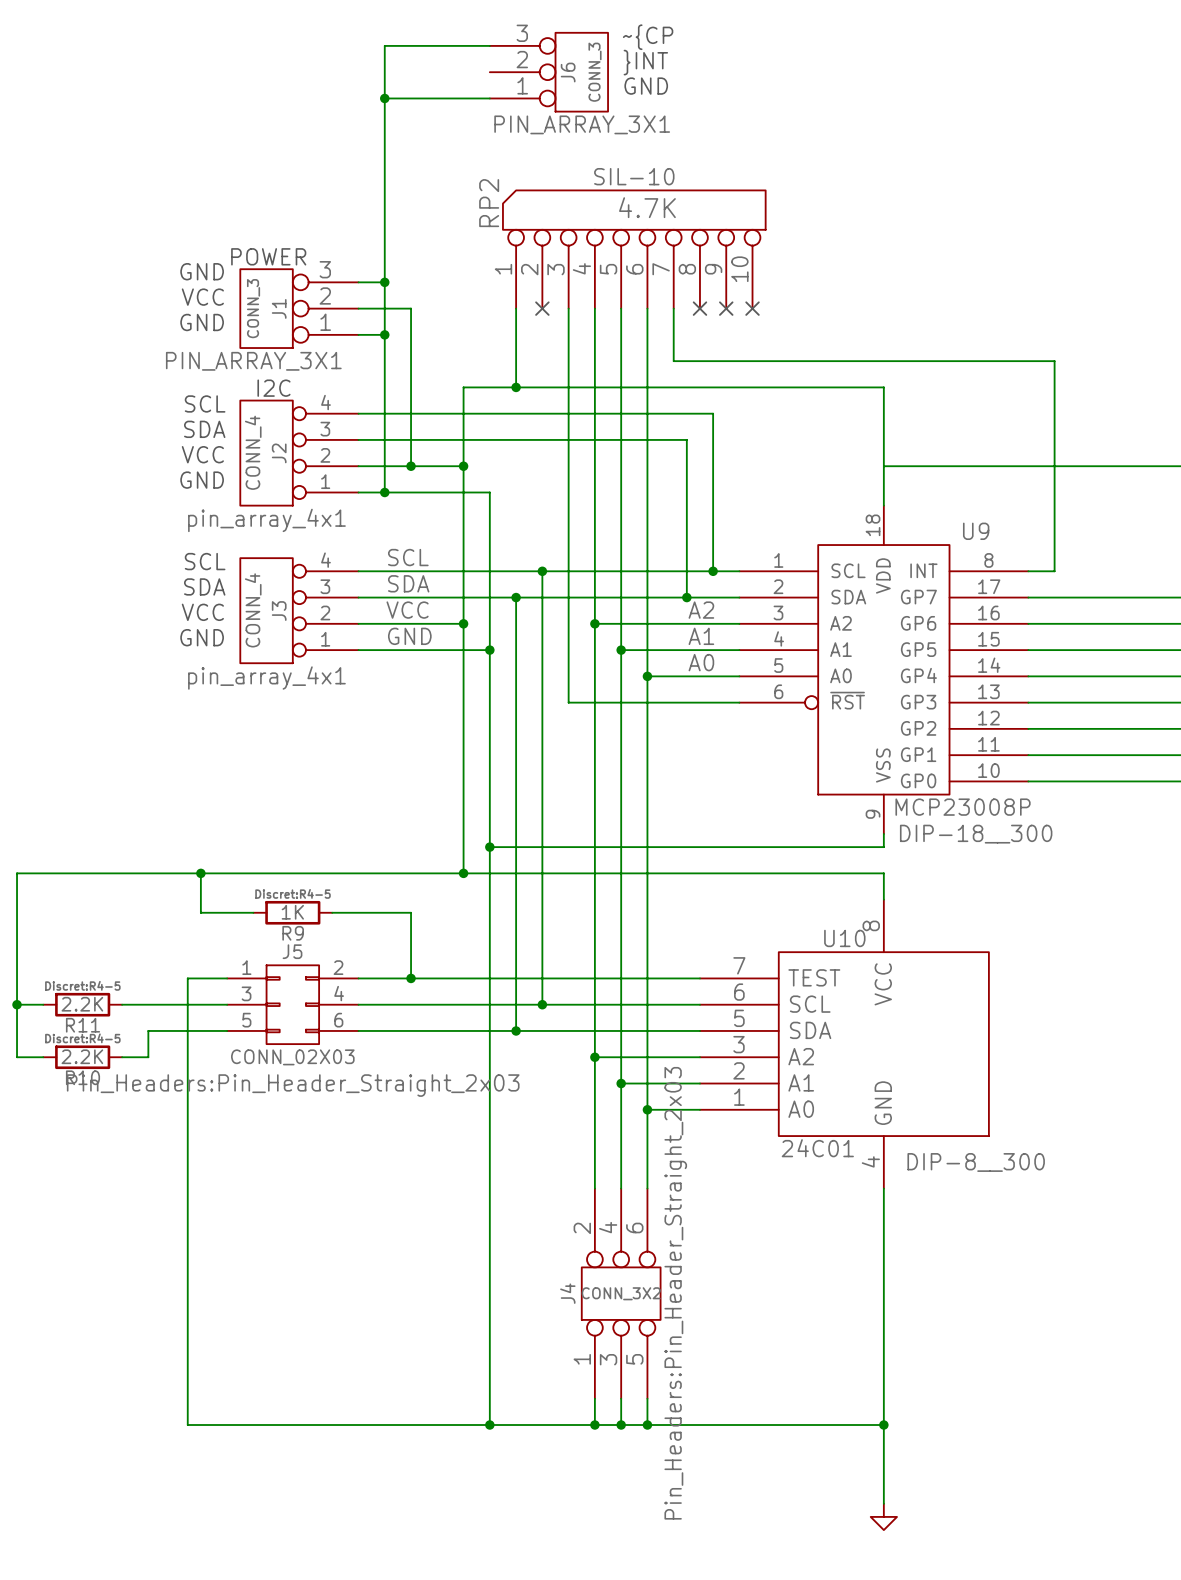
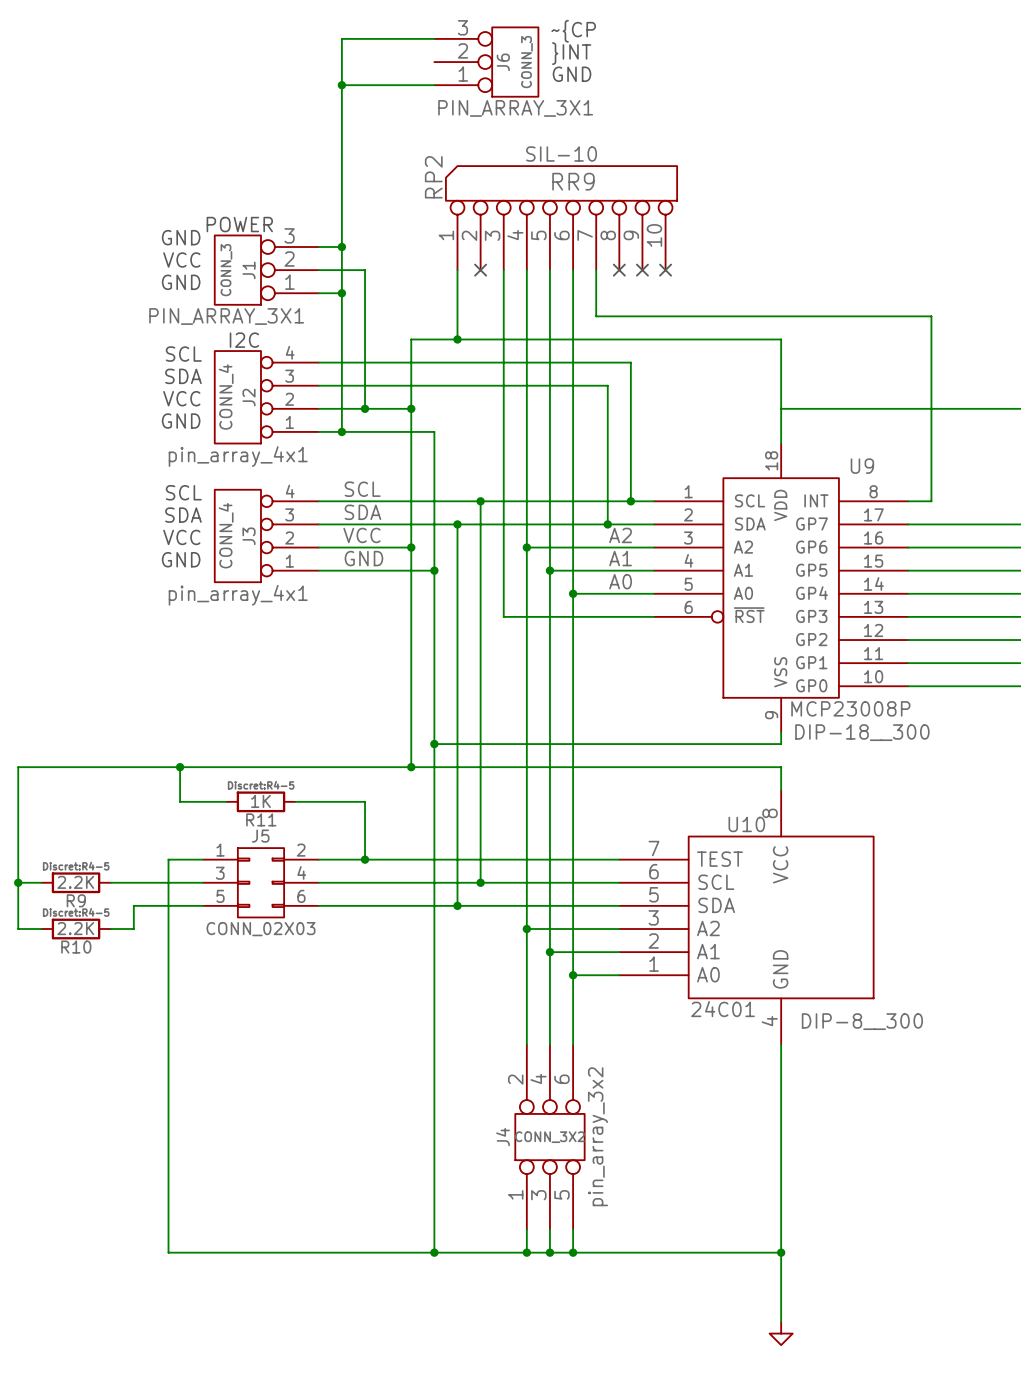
RP2 value: 4.7K (647, 207) -> RR9 (573, 181)
R9 name: R9 (293, 933) -> R11 (261, 819)
R11 name: R11 (83, 1025) -> R9 (76, 900)
J5 text: Pin_Headers:Pin_Header_Straight_2x03 (293, 1085) -> none
J4 text: Pin_Headers:Pin_Header_Straight_2x03 (675, 1293) -> pin_array_3x2 (598, 1136)

